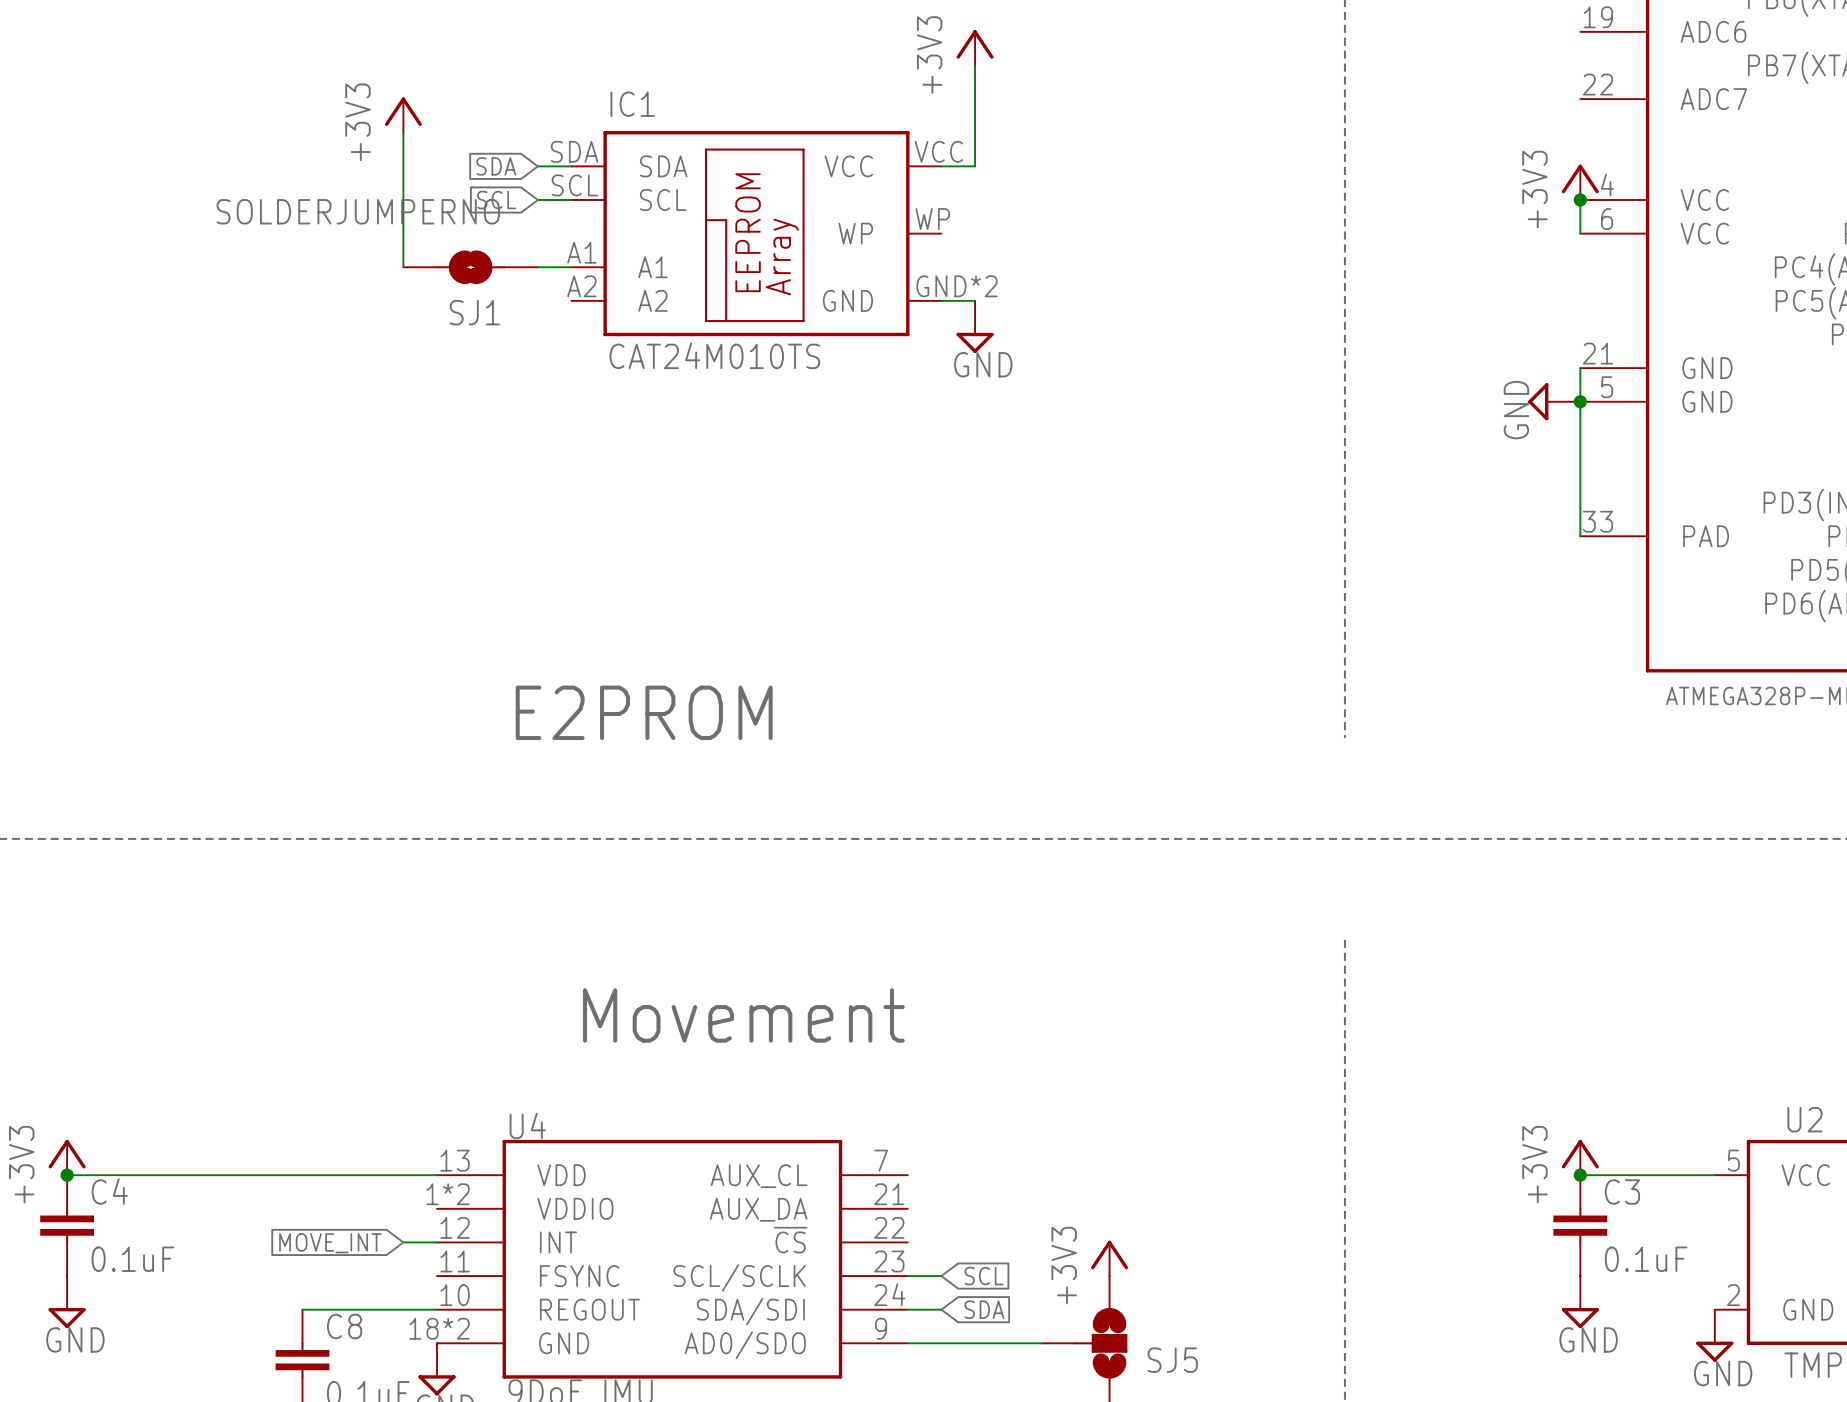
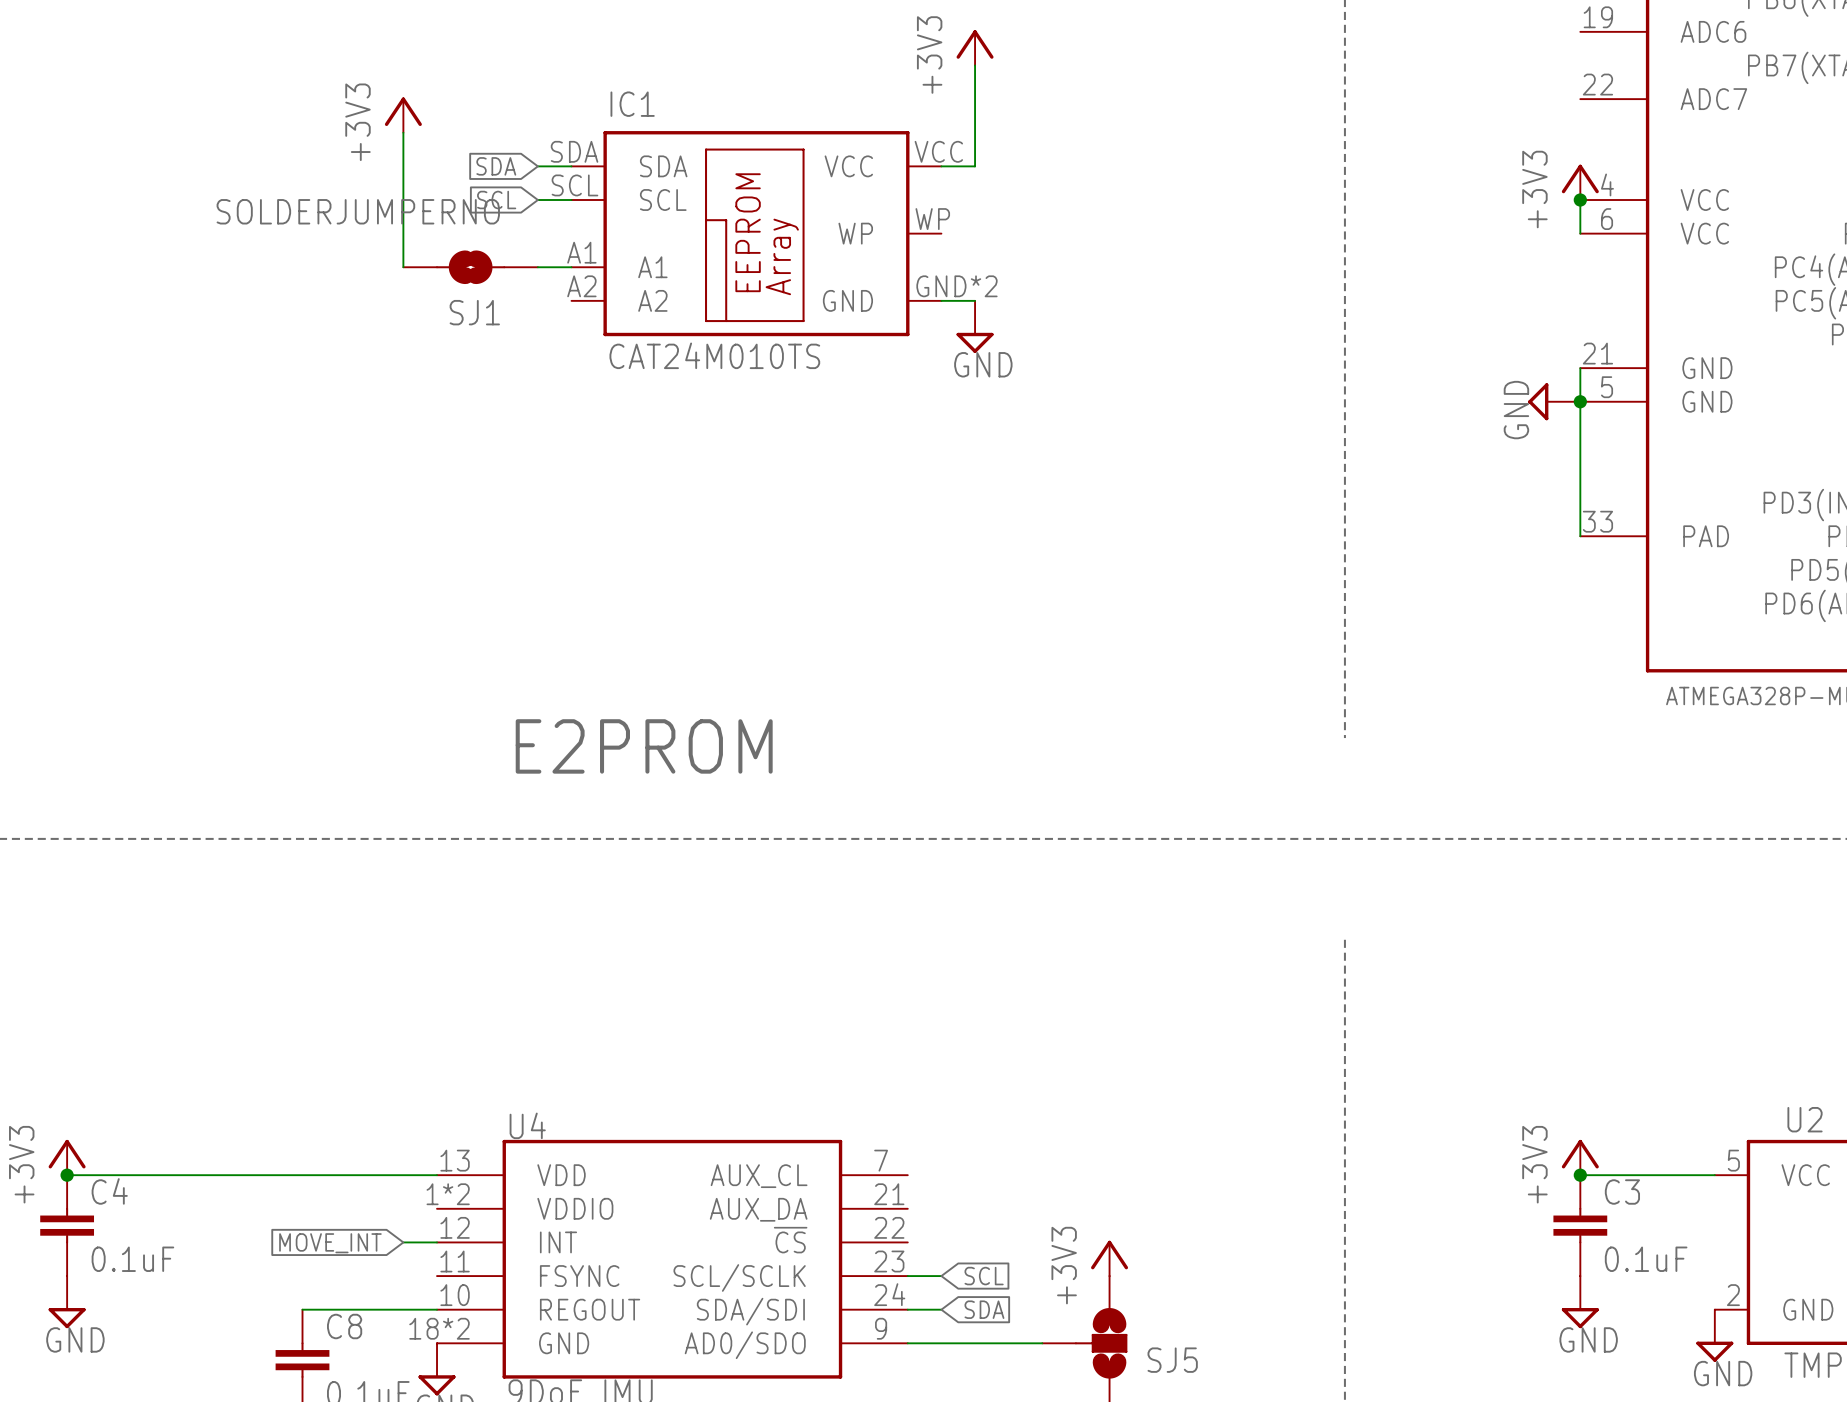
text position: E2PROM (644, 712) -> E2PROM (644, 746)
text: Movement (743, 1015) -> none

